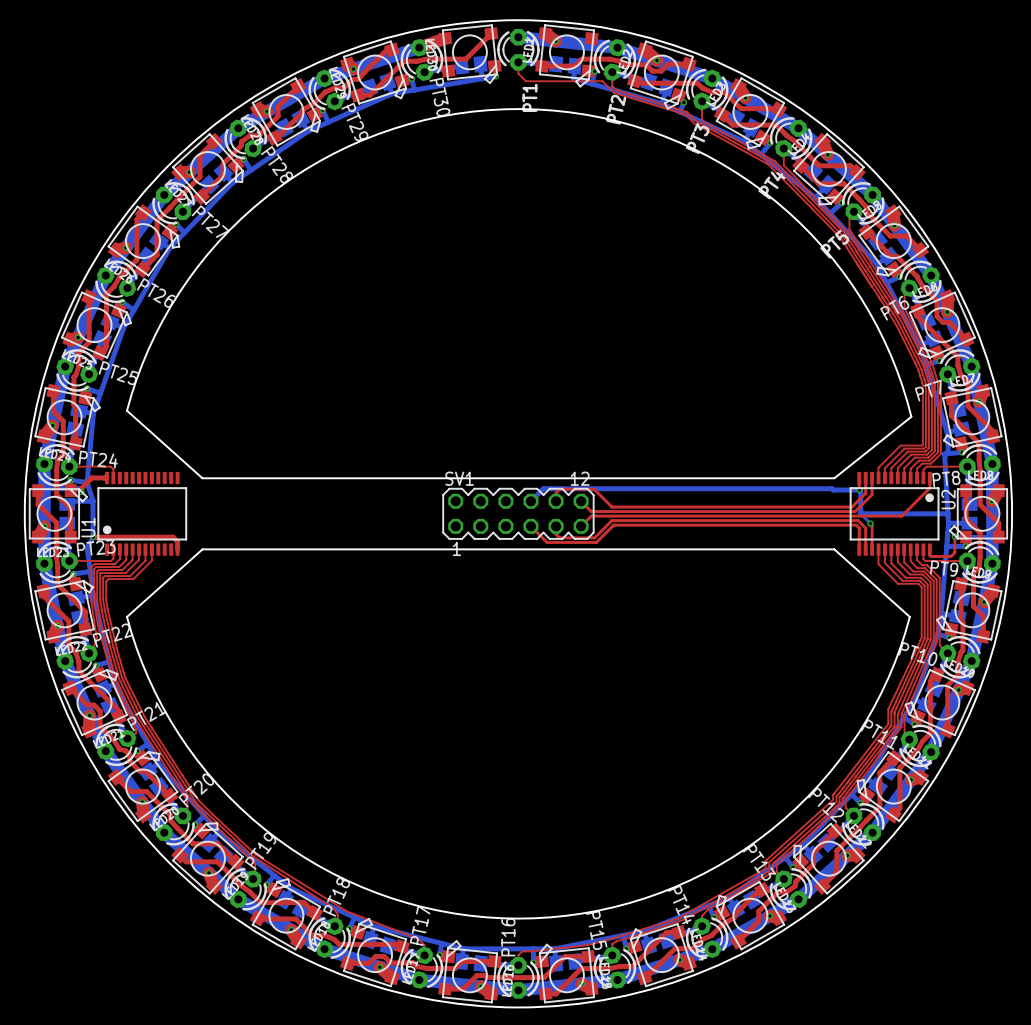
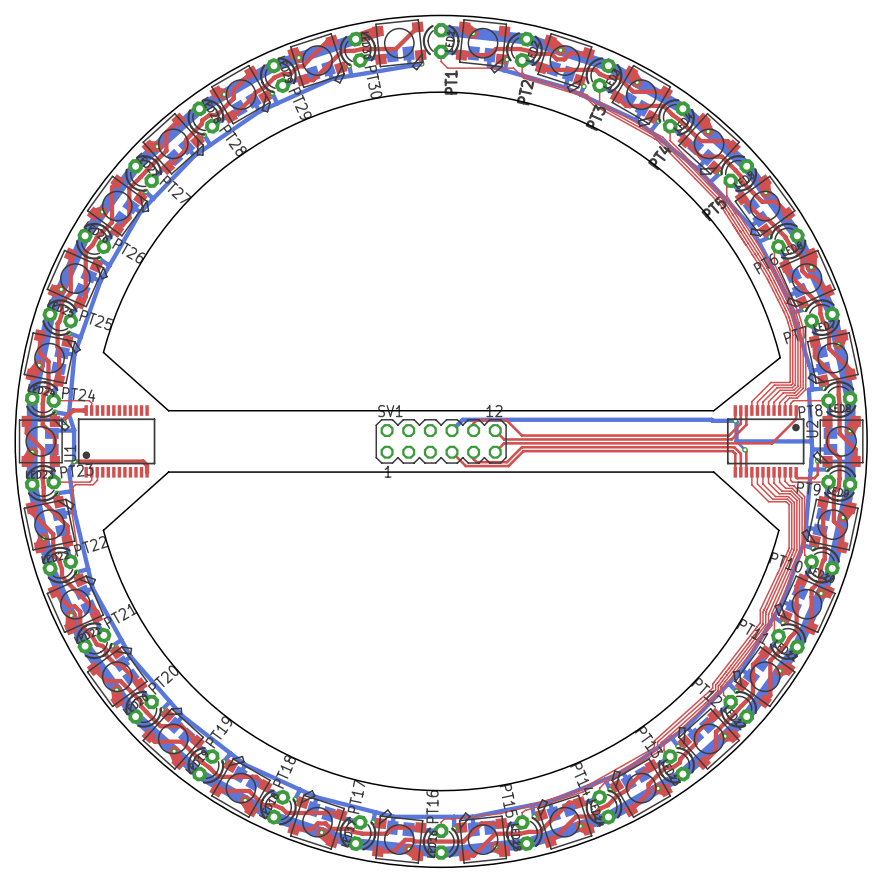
top track: (126, 549) (126, 559) (119, 567) (96, 567) (94, 569) (94, 600) (97, 625) (113, 680) (136, 729) (136, 733) (127, 738) -> none
top track: (132, 549) (132, 559) (122, 570) (97, 571) (97, 599) (100, 625) (116, 679) (134, 719) -> none
top track: (139, 549) (139, 559) (125, 573) (100, 573) (101, 610) (119, 678) (136, 715) (194, 805) (255, 863) (255, 877) (253, 879) -> none
top track: (145, 549) (145, 560) (130, 576) (104, 576) (103, 577) (103, 599) (113, 647) (122, 678) (140, 715) (197, 804) (252, 856) (334, 908) (337, 915) (337, 923) (334, 926) -> none
top track: (151, 549) (151, 560) (133, 579) (108, 579) (106, 581) (107, 608) (125, 679) (144, 716) (199, 800) (255, 854) (346, 911) (418, 939) (424, 945) (424, 955) -> none
top track: (131, 713) (187, 800) (187, 811) (182, 815) -> none

